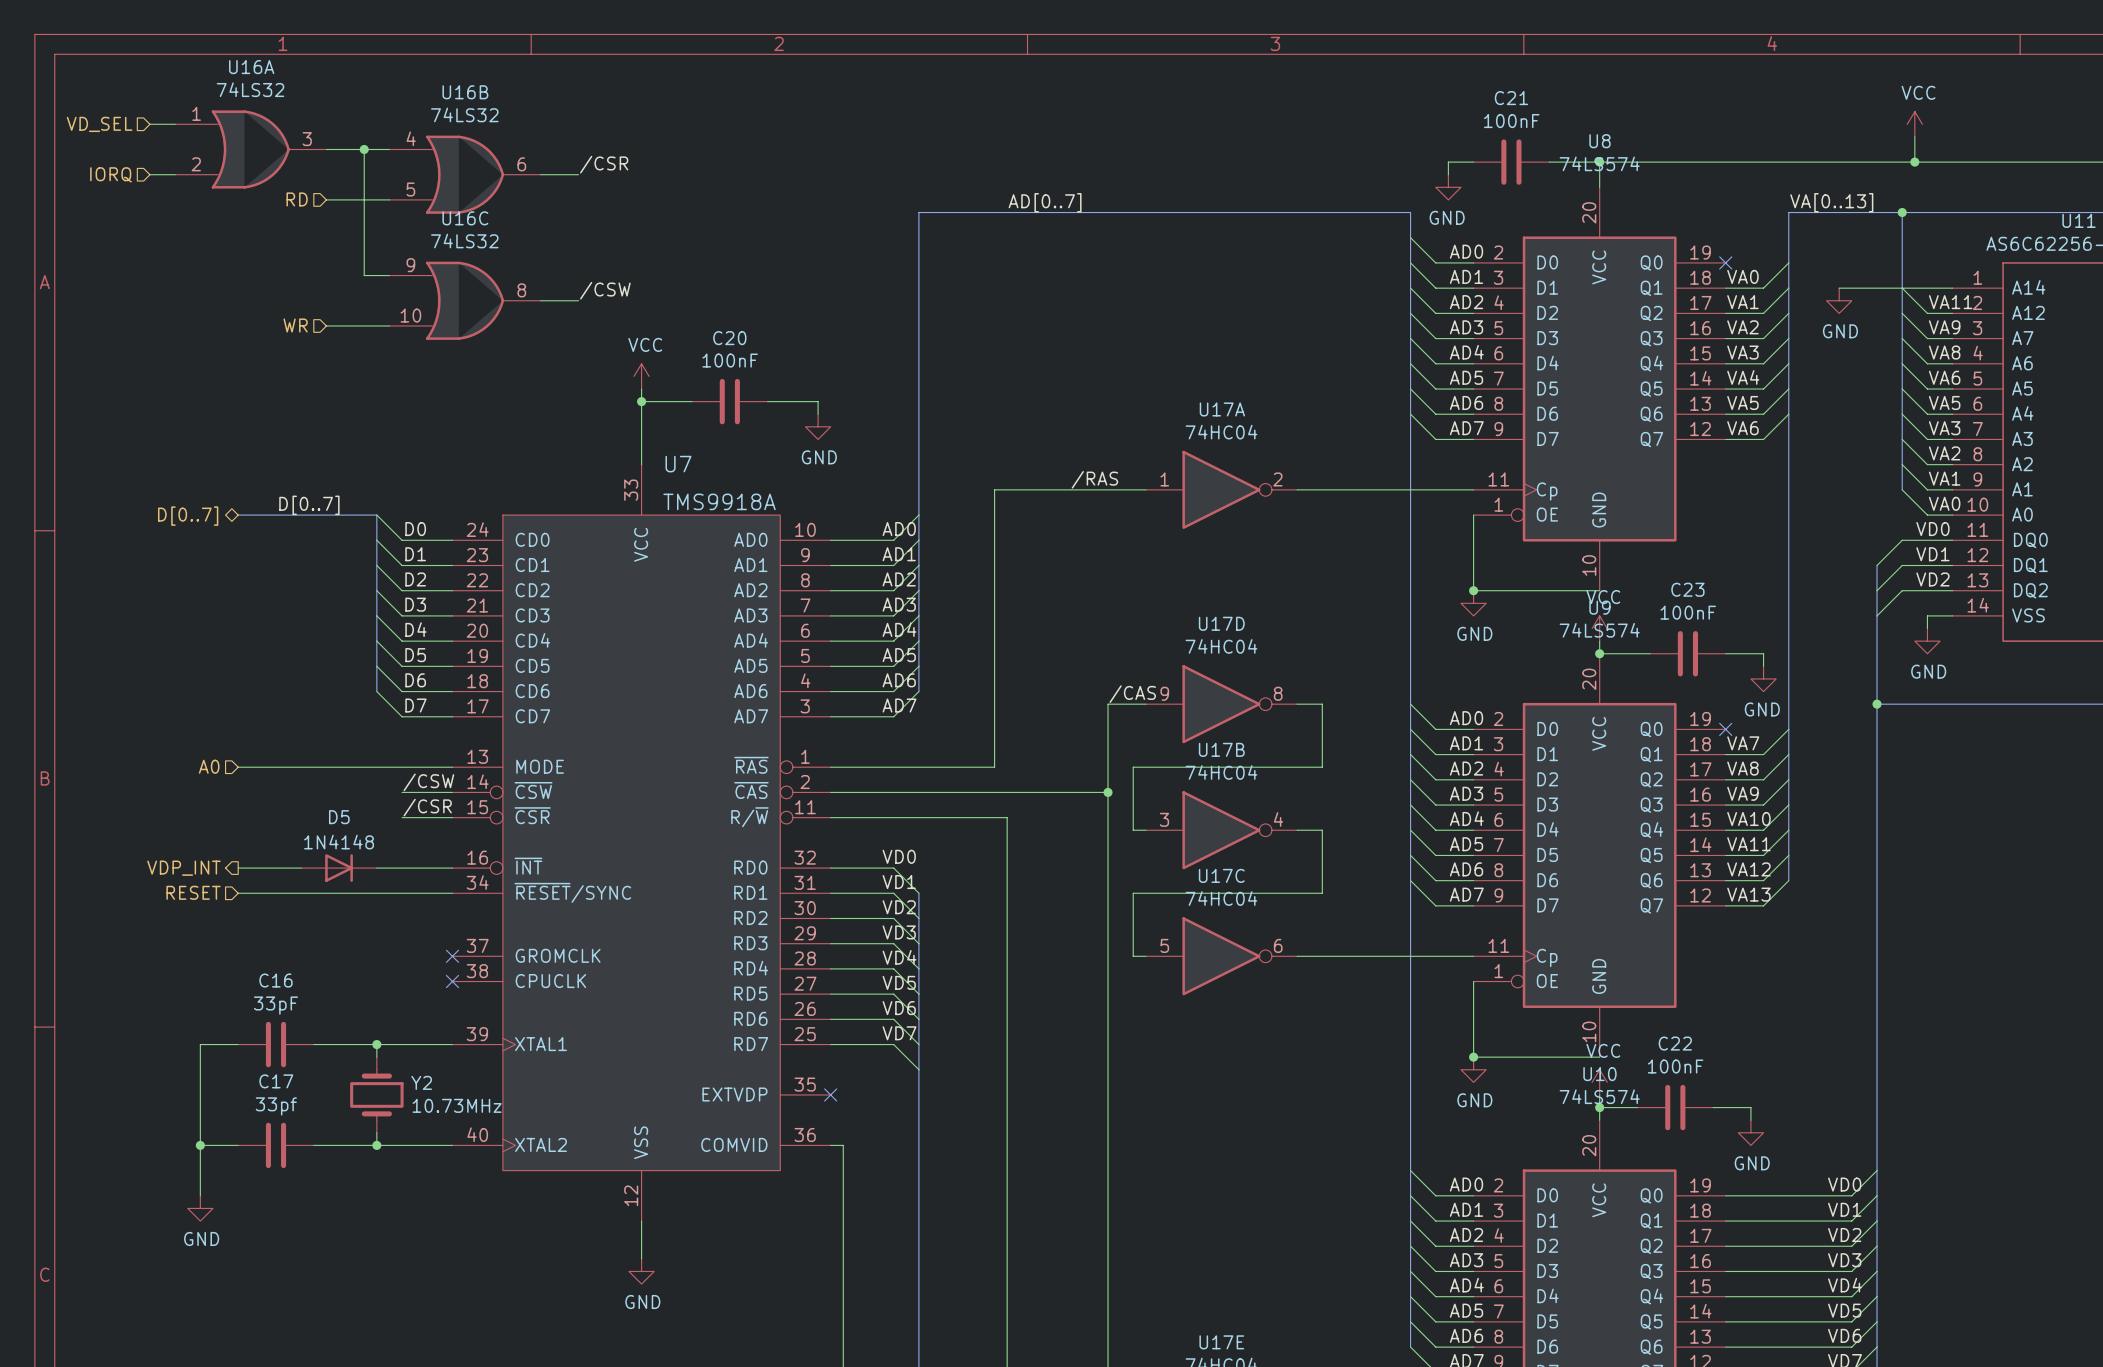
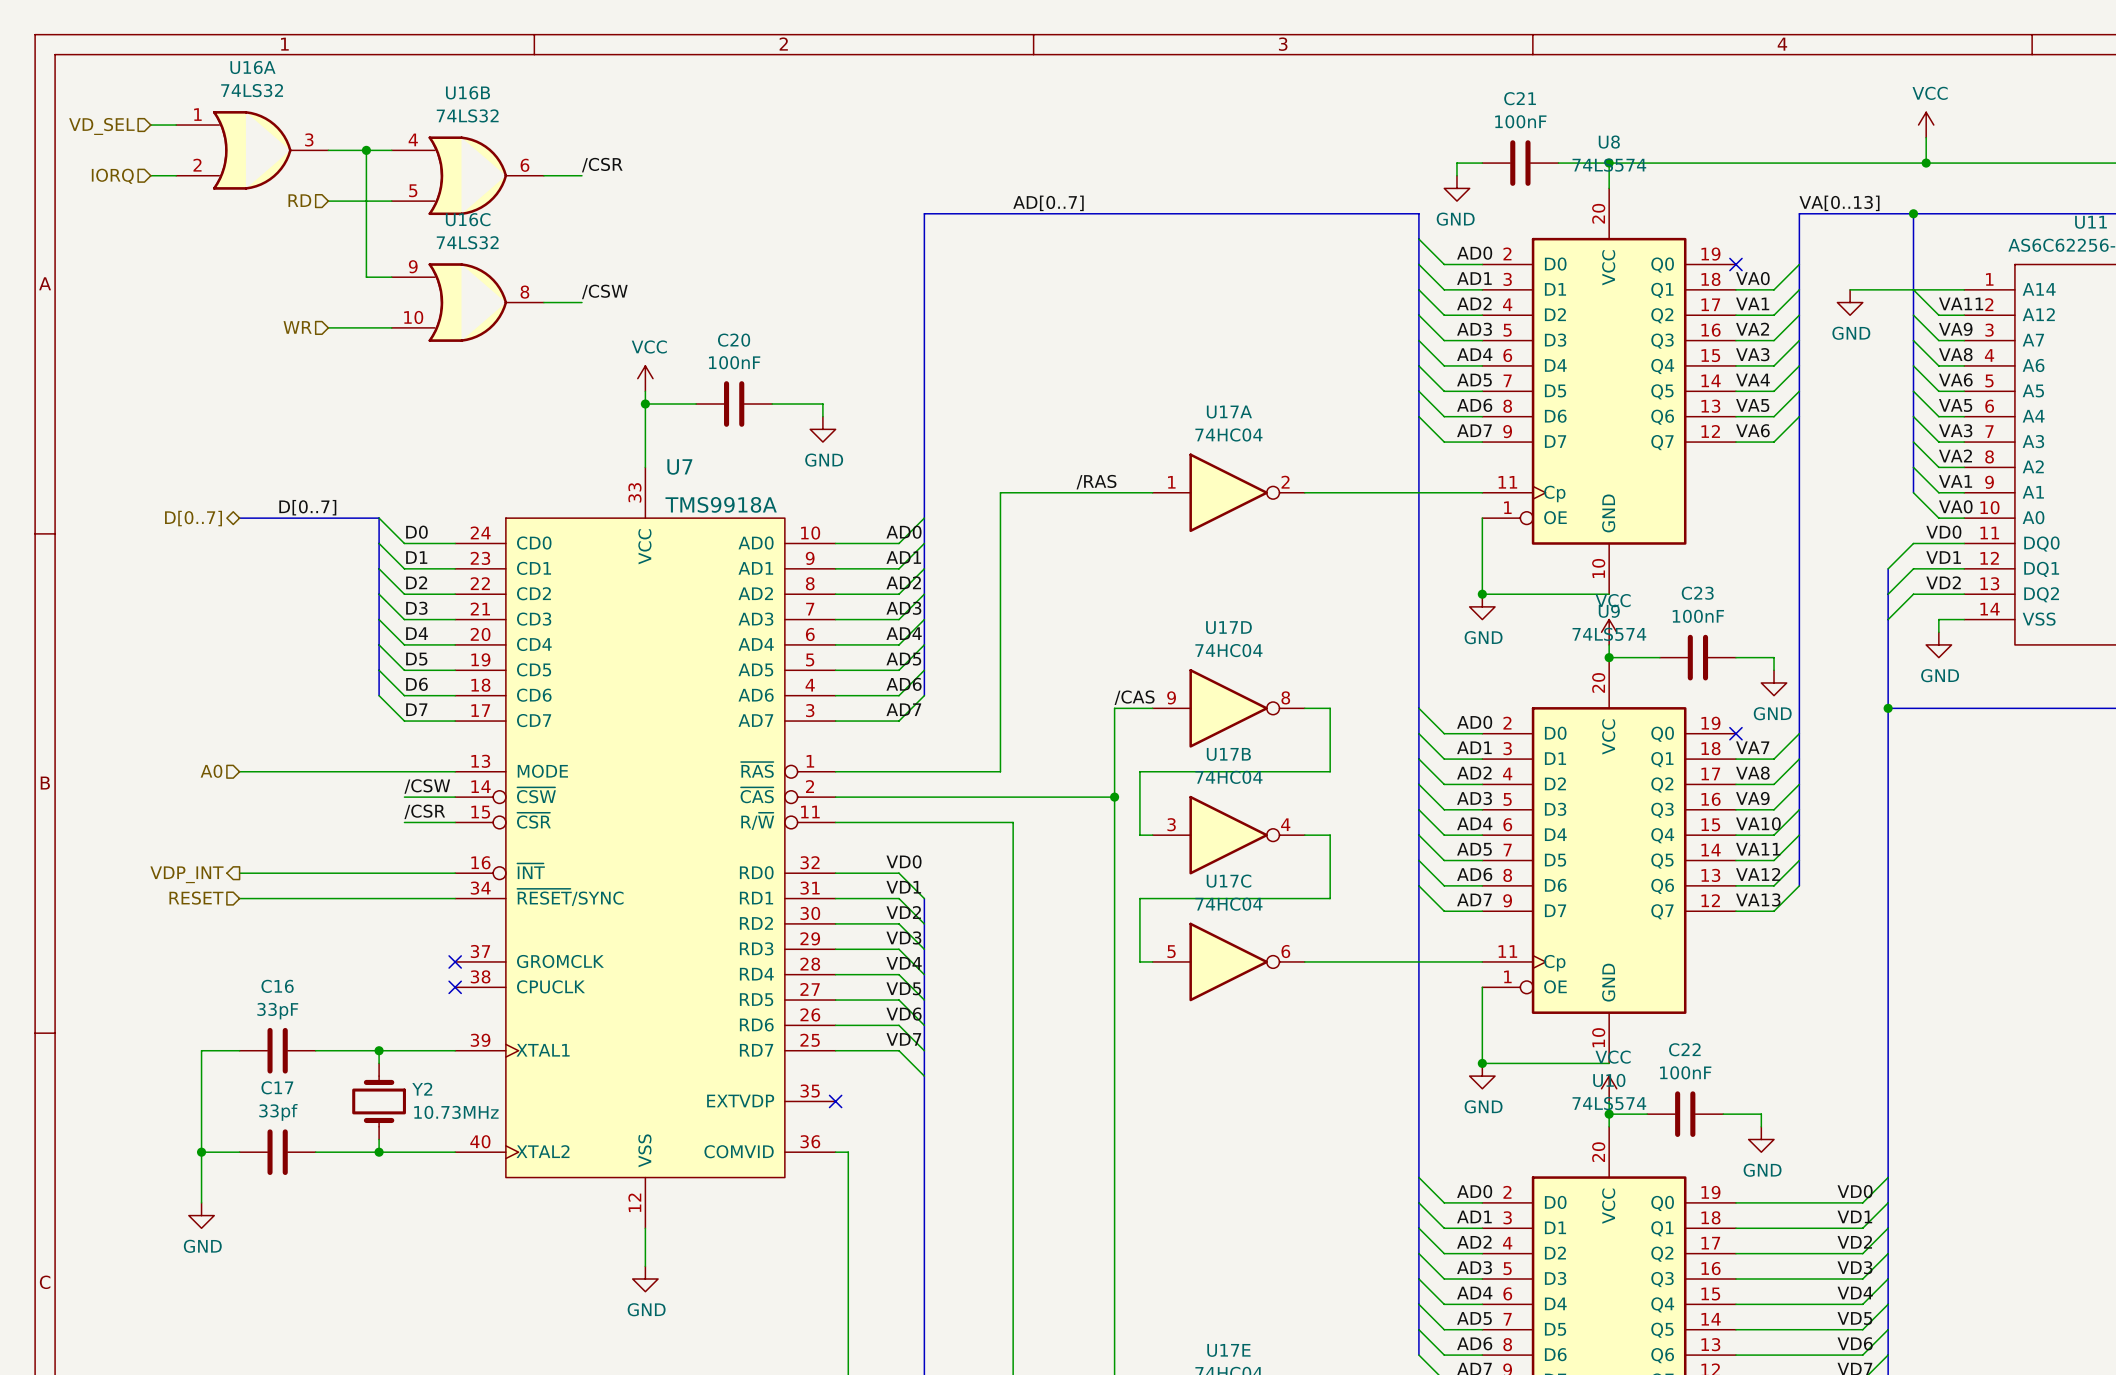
D5: 1N4148 (339, 868) -> none

